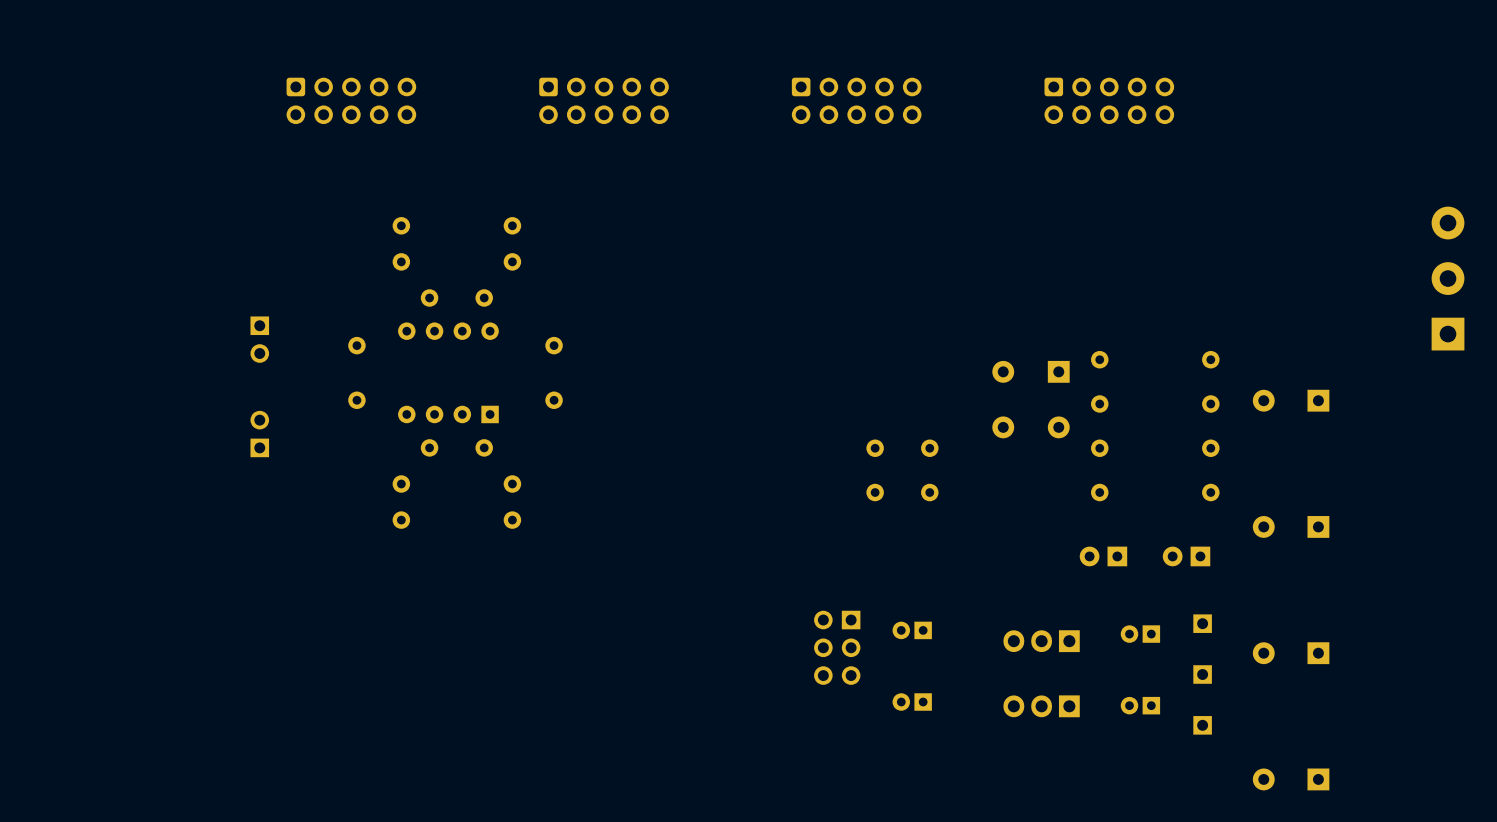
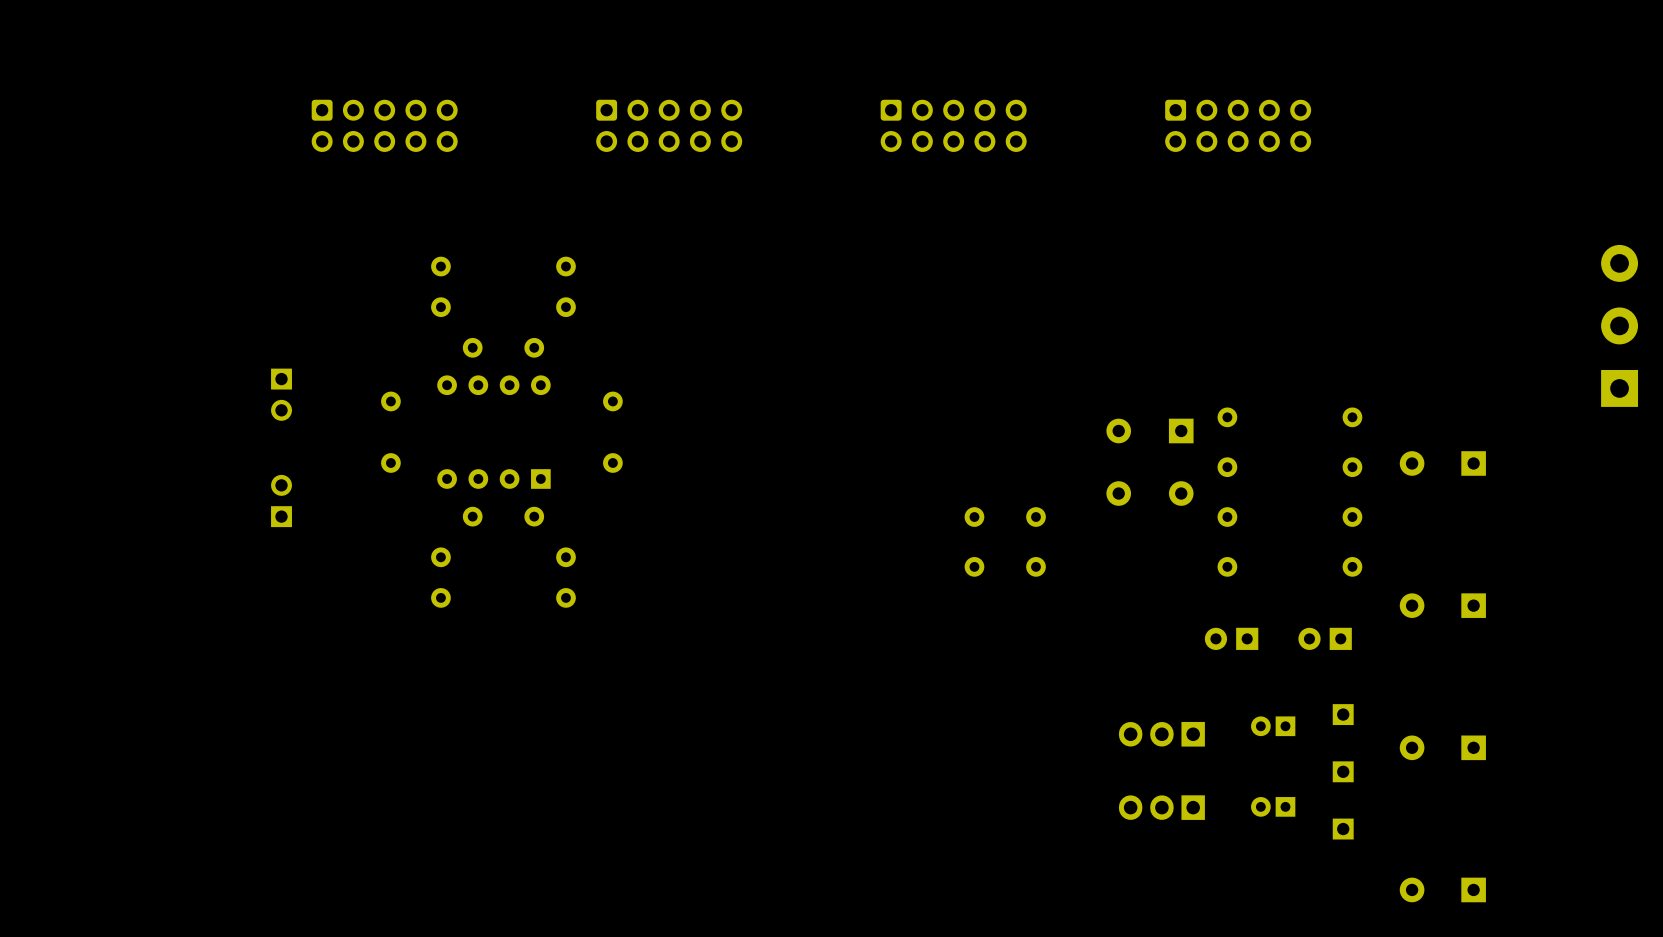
part: (912, 630) -> none
part: (837, 647) -> none
part: (912, 702) -> none

